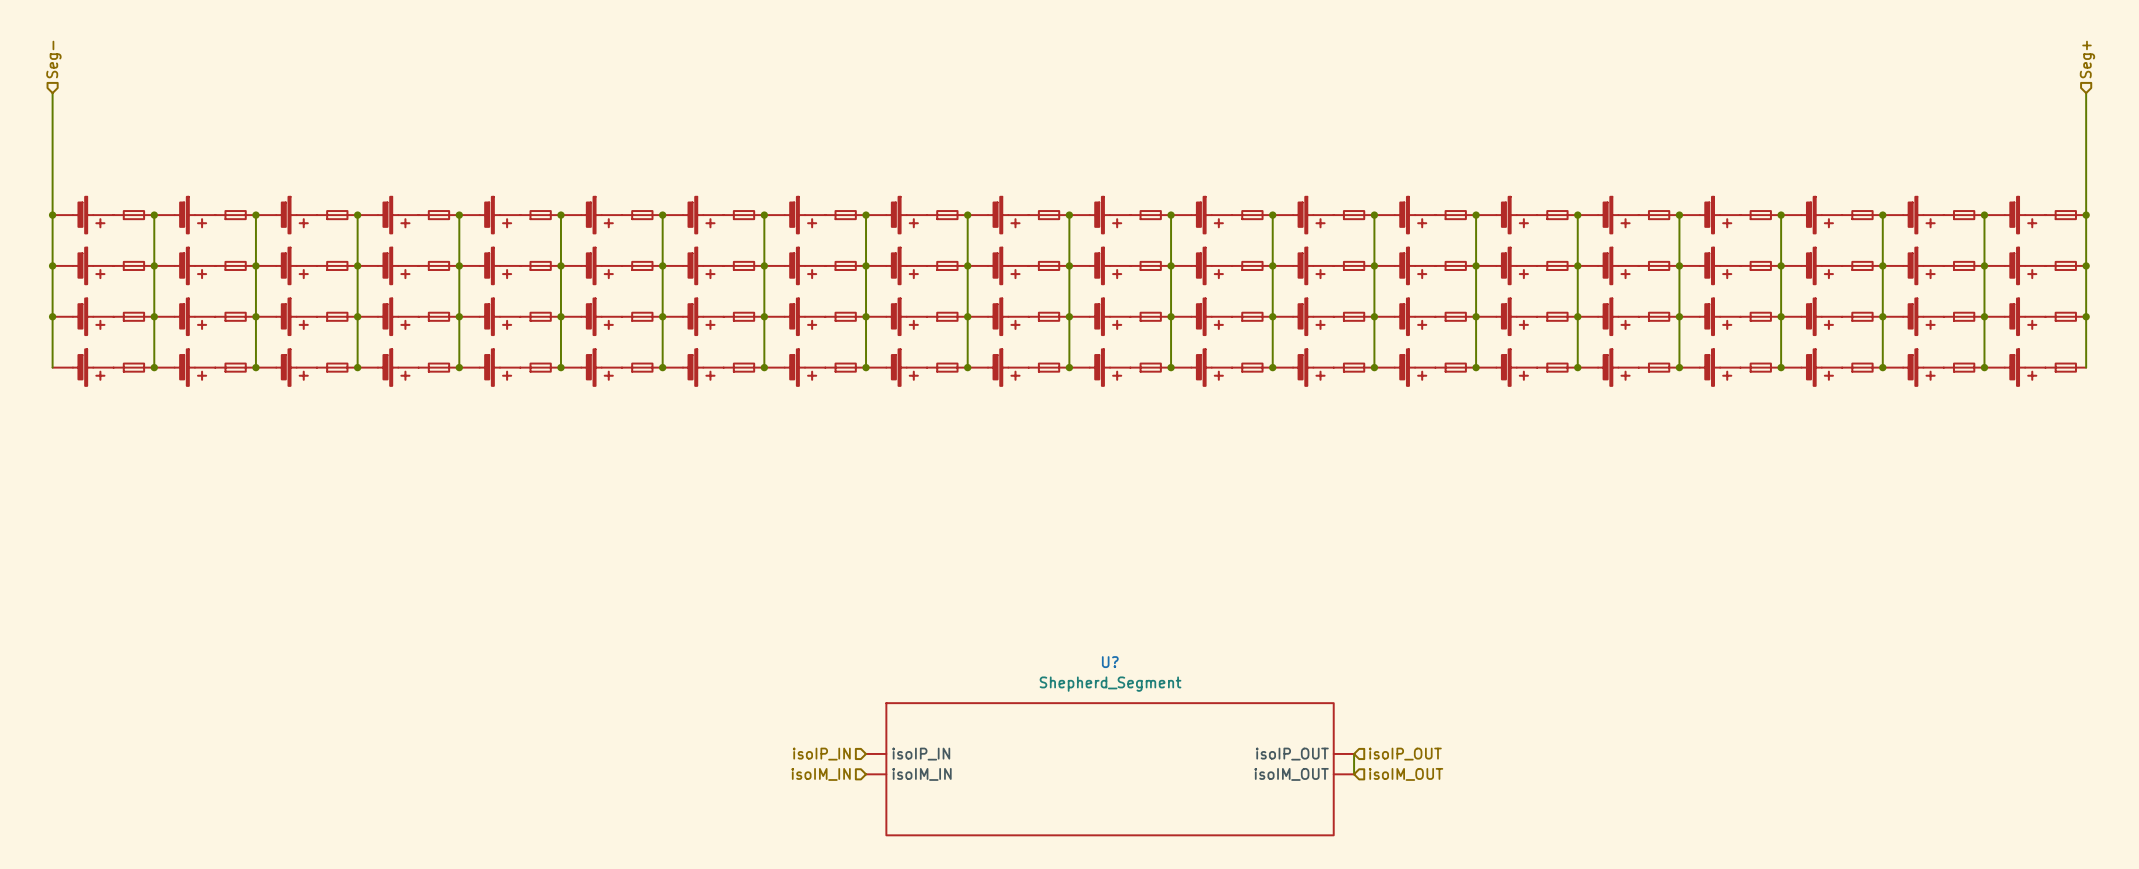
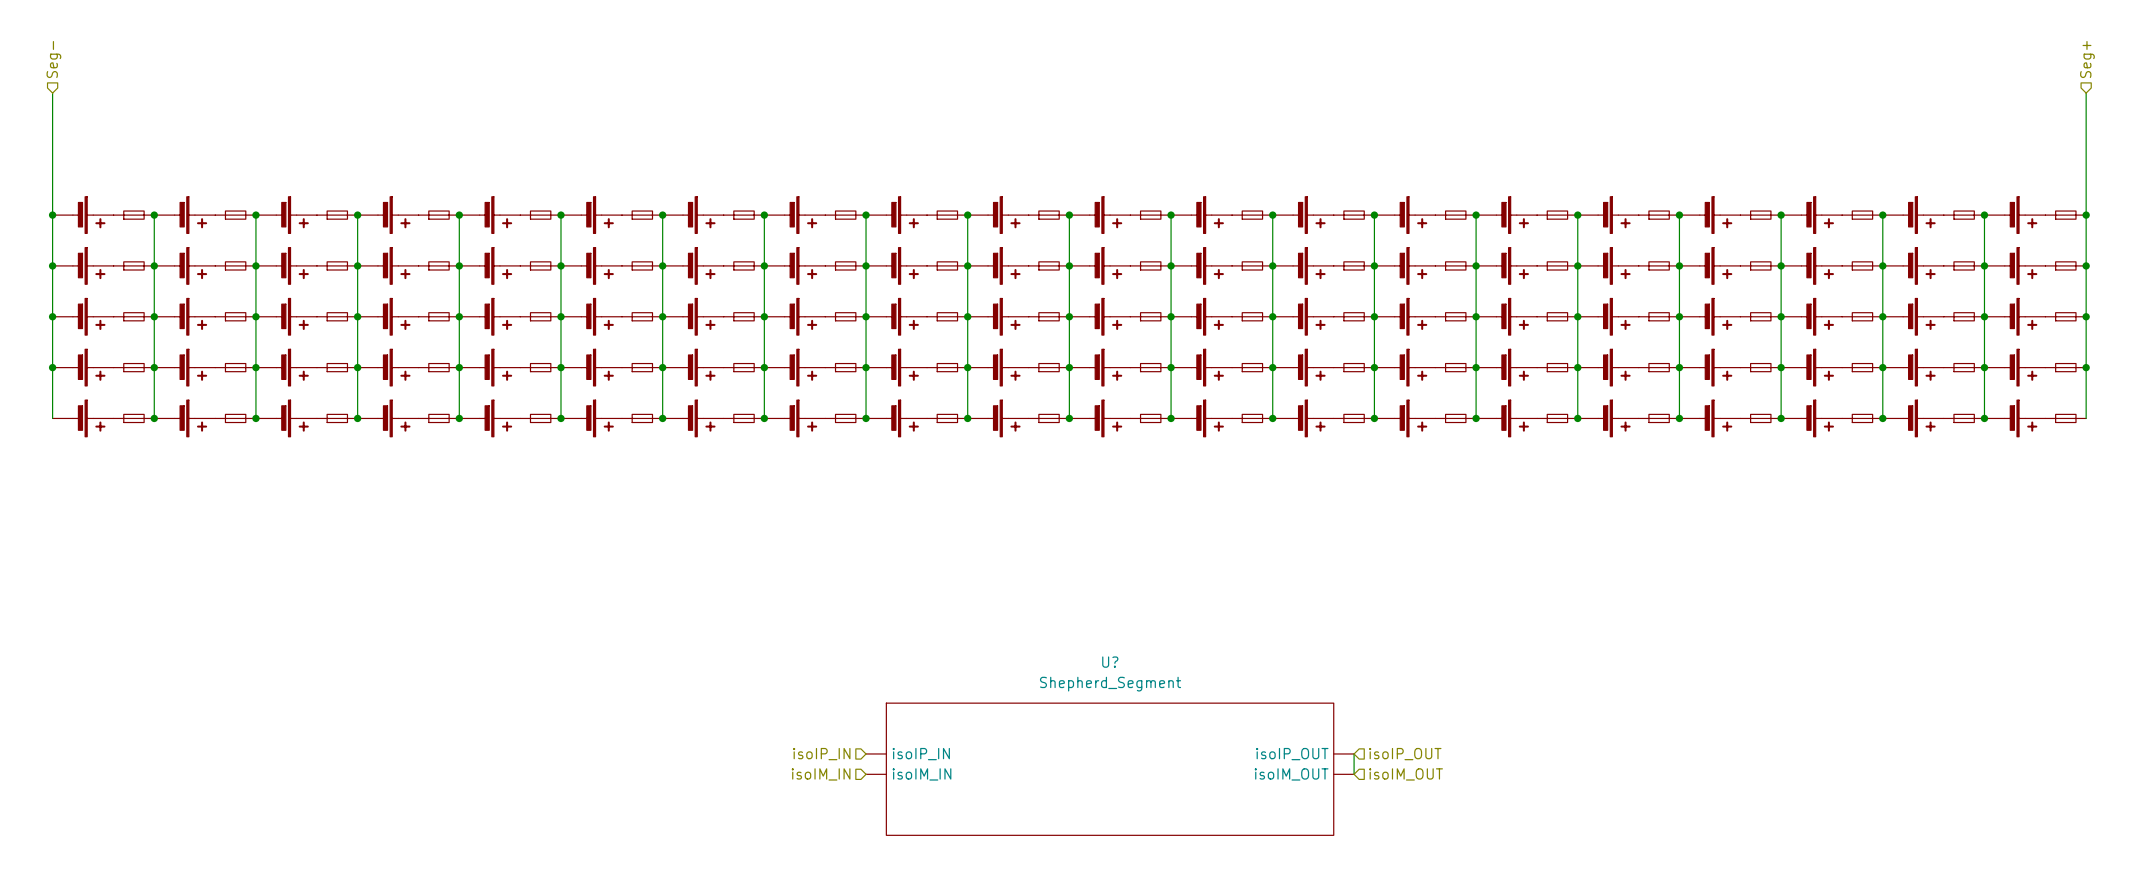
wire: none -> (52, 367) (52, 418)
junction: none -> (52, 367)
wire: none -> (154, 367) (154, 418)
wire: none -> (255, 367) (255, 418)
wire: none -> (357, 367) (357, 418)
wire: none -> (459, 367) (459, 418)
wire: none -> (560, 367) (560, 418)
wire: none -> (662, 367) (662, 418)
wire: none -> (764, 367) (764, 418)
wire: none -> (866, 367) (866, 418)
wire: none -> (967, 367) (967, 418)
wire: none -> (1069, 367) (1069, 418)
wire: none -> (1171, 367) (1171, 418)
wire: none -> (1272, 367) (1272, 418)
wire: none -> (1374, 367) (1374, 418)
wire: none -> (1476, 367) (1476, 418)
wire: none -> (1577, 367) (1577, 418)
wire: none -> (1679, 367) (1679, 418)
wire: none -> (1781, 367) (1781, 418)
wire: none -> (1882, 367) (1882, 418)
wire: none -> (1984, 367) (1984, 418)
wire: none -> (2086, 367) (2086, 418)
junction: none -> (2086, 367)
part: none -> (83, 418)
part: none -> (133, 418)
junction: none -> (154, 418)
part: none -> (184, 418)
part: none -> (235, 418)
junction: none -> (255, 418)
part: none -> (286, 418)
part: none -> (337, 418)
junction: none -> (357, 418)
part: none -> (388, 418)
part: none -> (438, 418)
junction: none -> (459, 418)
part: none -> (489, 418)
part: none -> (540, 418)
junction: none -> (560, 418)
part: none -> (591, 418)
part: none -> (642, 418)
junction: none -> (662, 418)
part: none -> (693, 418)
part: none -> (744, 418)
junction: none -> (764, 418)
part: none -> (794, 418)
part: none -> (845, 418)
junction: none -> (866, 418)
part: none -> (896, 418)
part: none -> (947, 418)
junction: none -> (967, 418)
part: none -> (998, 418)
part: none -> (1049, 418)
junction: none -> (1069, 418)
part: none -> (1099, 418)
part: none -> (1150, 418)
junction: none -> (1171, 418)
part: none -> (1201, 418)
part: none -> (1252, 418)
junction: none -> (1272, 418)
part: none -> (1303, 418)
part: none -> (1354, 418)
junction: none -> (1374, 418)
part: none -> (1404, 418)
part: none -> (1455, 418)
junction: none -> (1476, 418)
part: none -> (1506, 418)
part: none -> (1557, 418)
junction: none -> (1577, 418)
part: none -> (1608, 418)
part: none -> (1659, 418)
junction: none -> (1679, 418)
part: none -> (1709, 418)
part: none -> (1760, 418)
junction: none -> (1781, 418)
part: none -> (1811, 418)
part: none -> (1862, 418)
junction: none -> (1882, 418)
part: none -> (1913, 418)
part: none -> (1964, 418)
junction: none -> (1984, 418)
part: none -> (2014, 418)
part: none -> (2065, 418)

